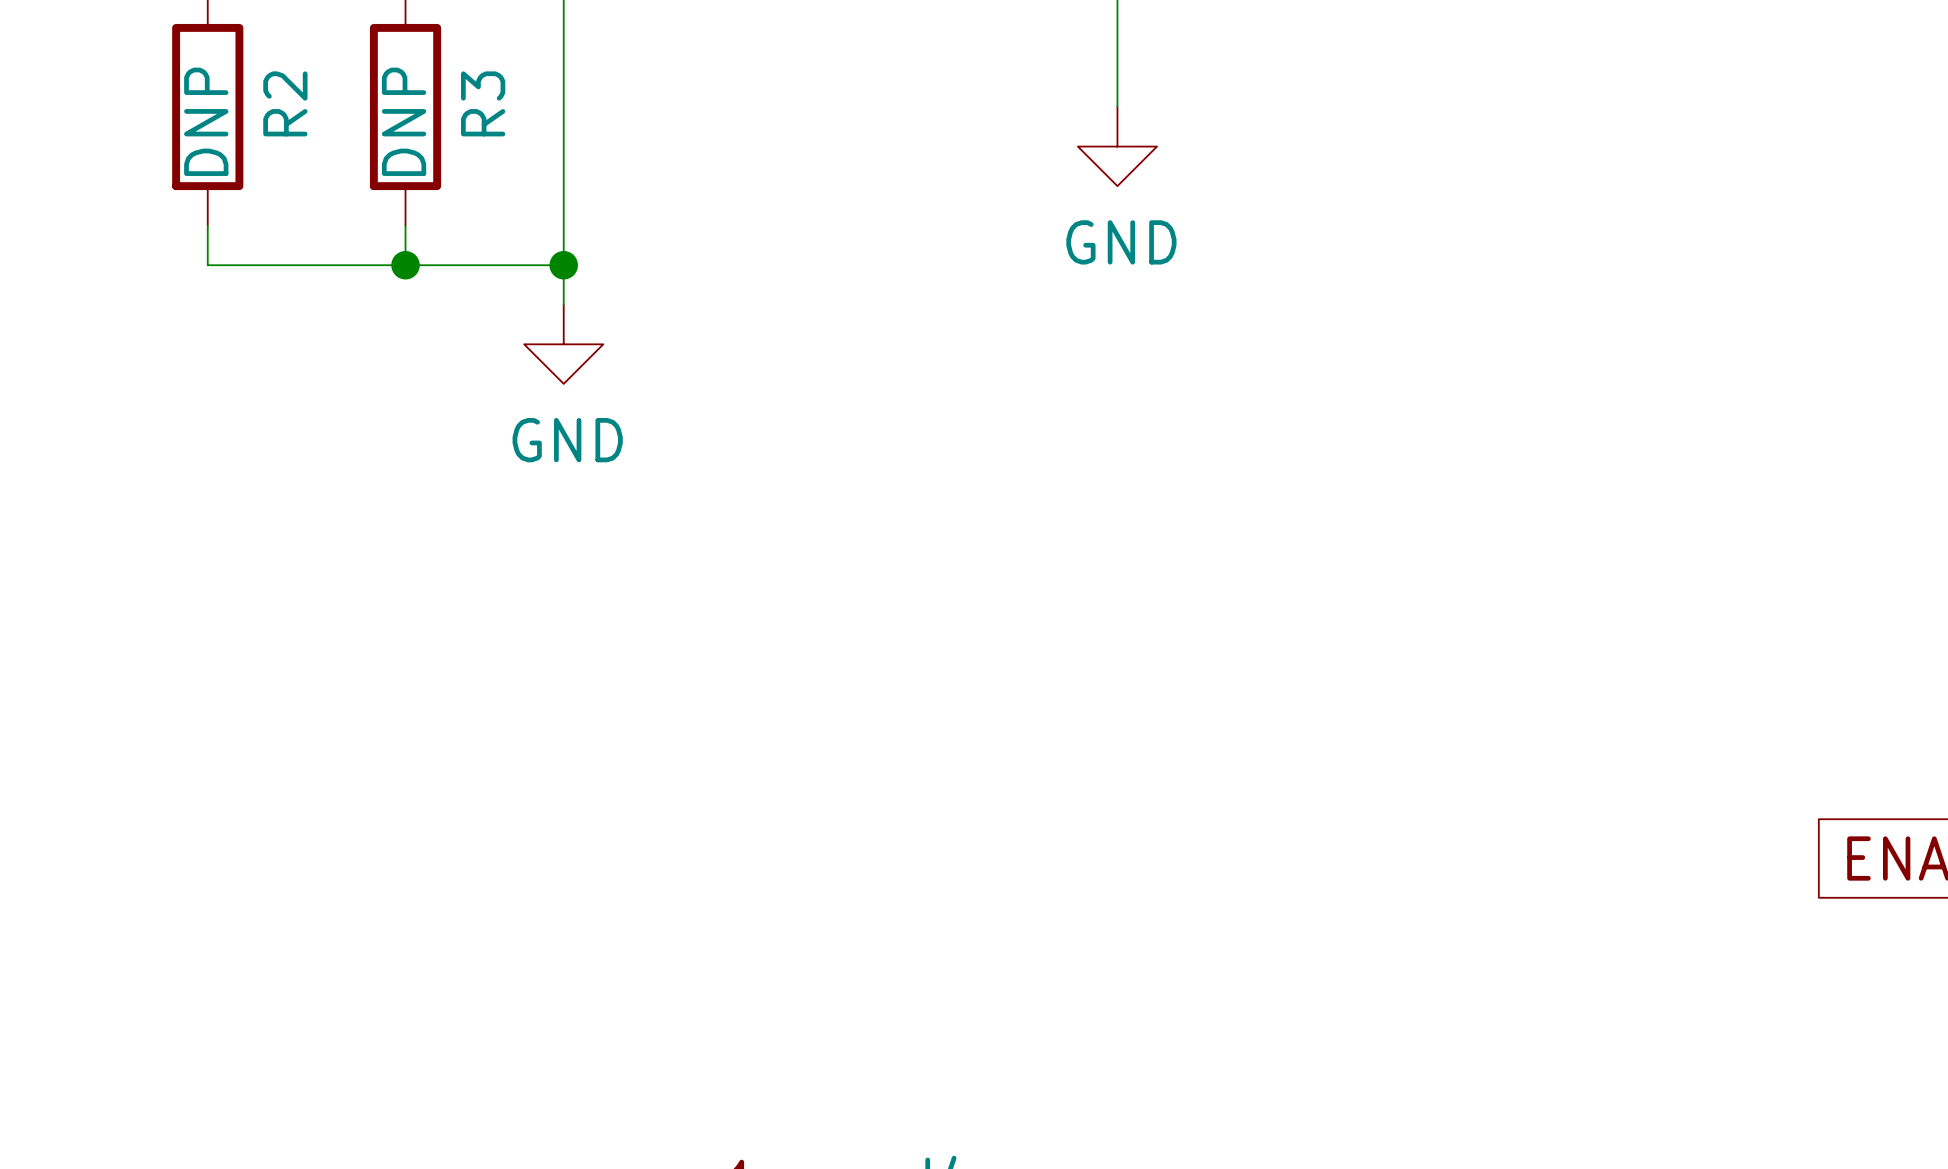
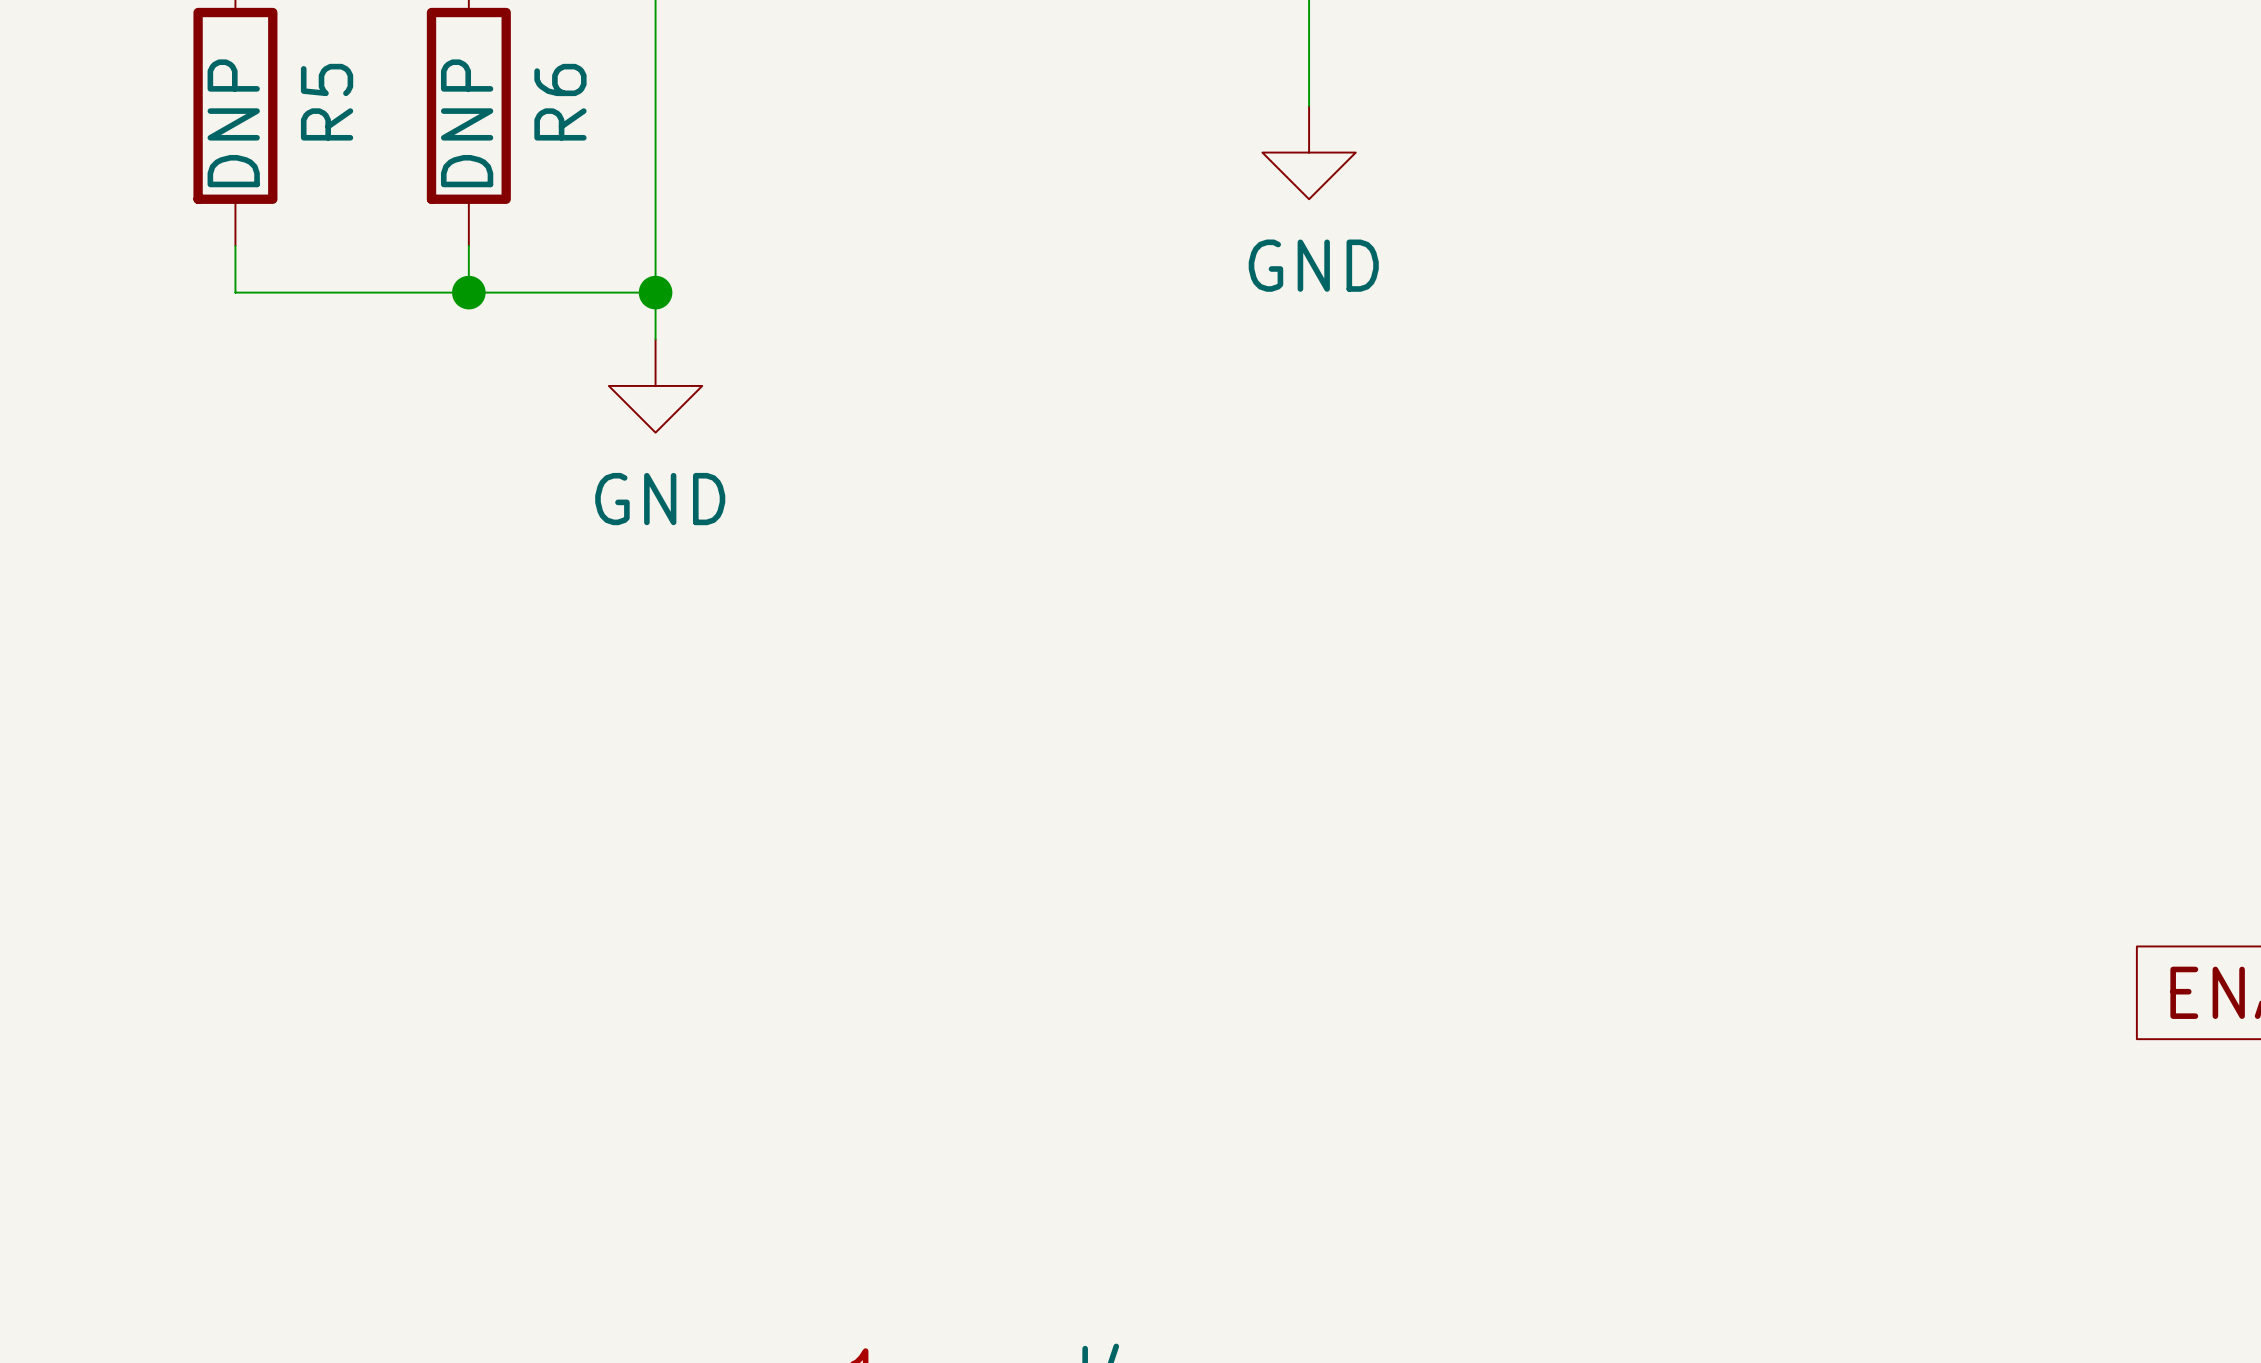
R2 name: R2 (285, 103) -> R5 (327, 102)
R3 name: R3 (483, 103) -> R6 (560, 102)

